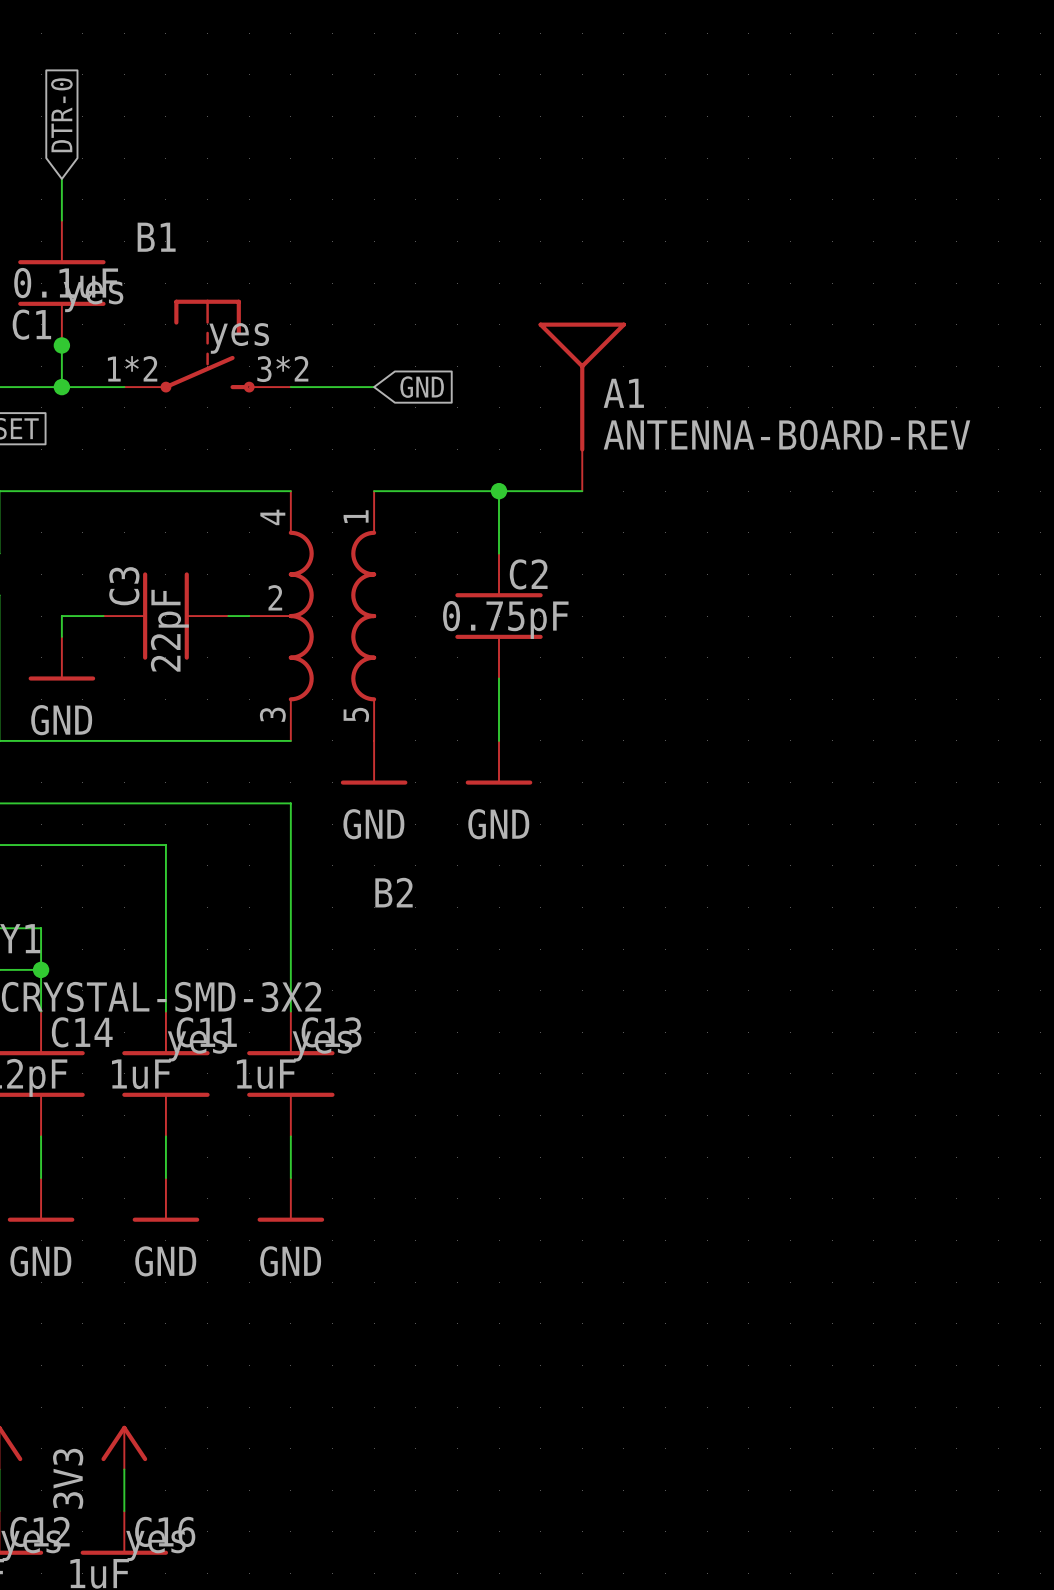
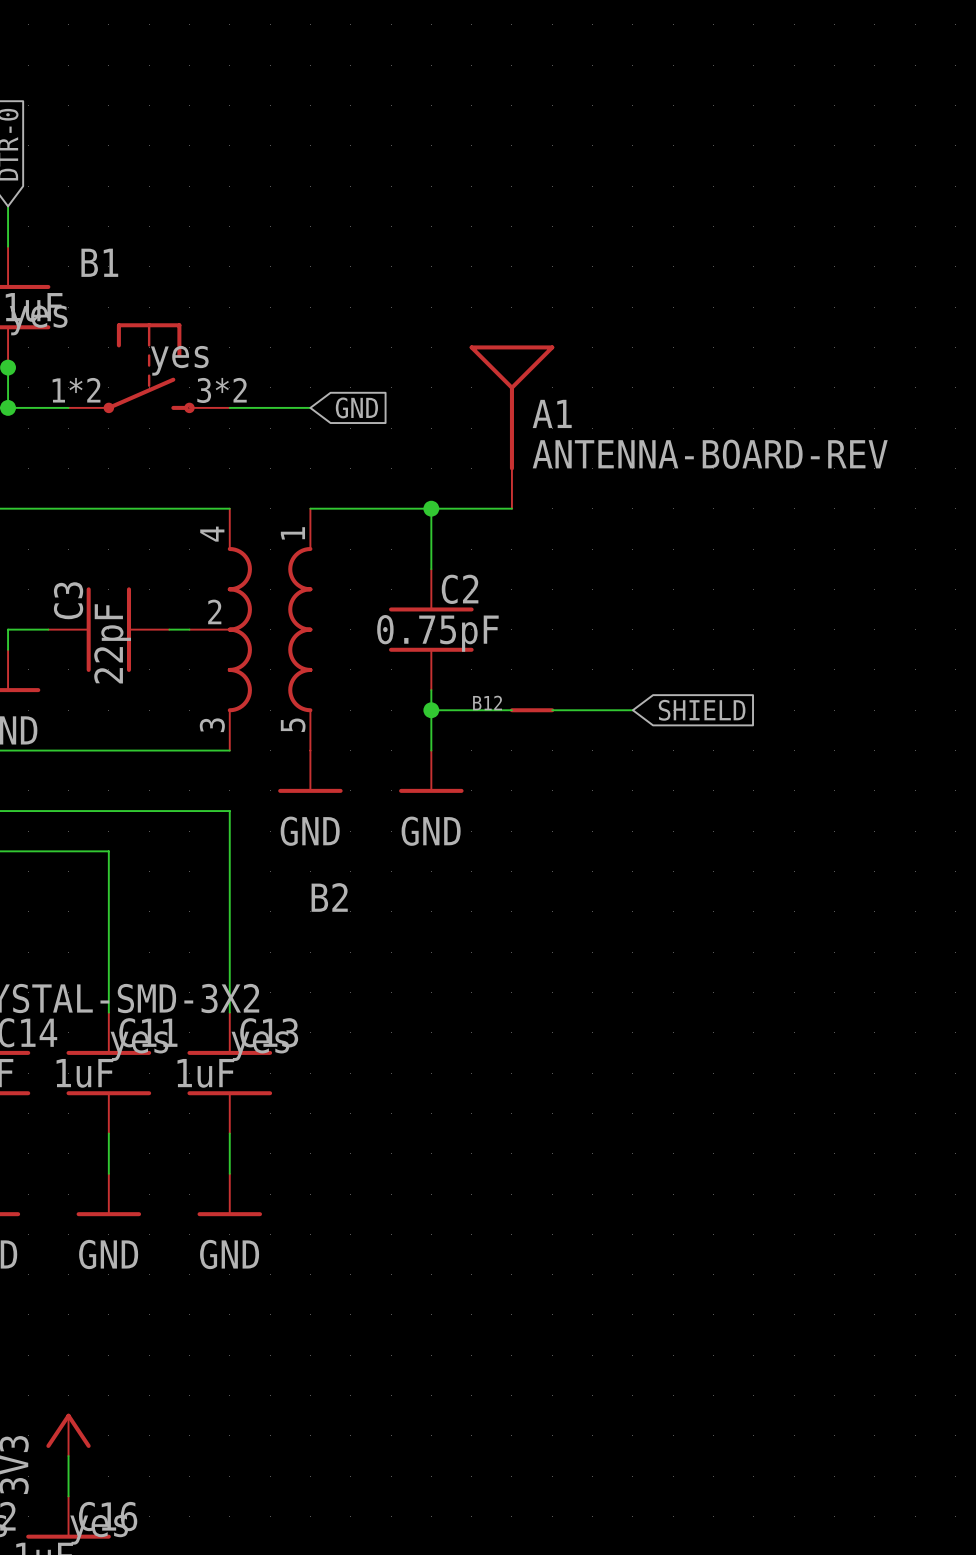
wire: none -> (431, 710) (511, 710)
junction: none -> (431, 710)
B12: none -> (532, 710)
wire: none -> (552, 710) (632, 710)
global label: none -> SHIELD (702, 710)

